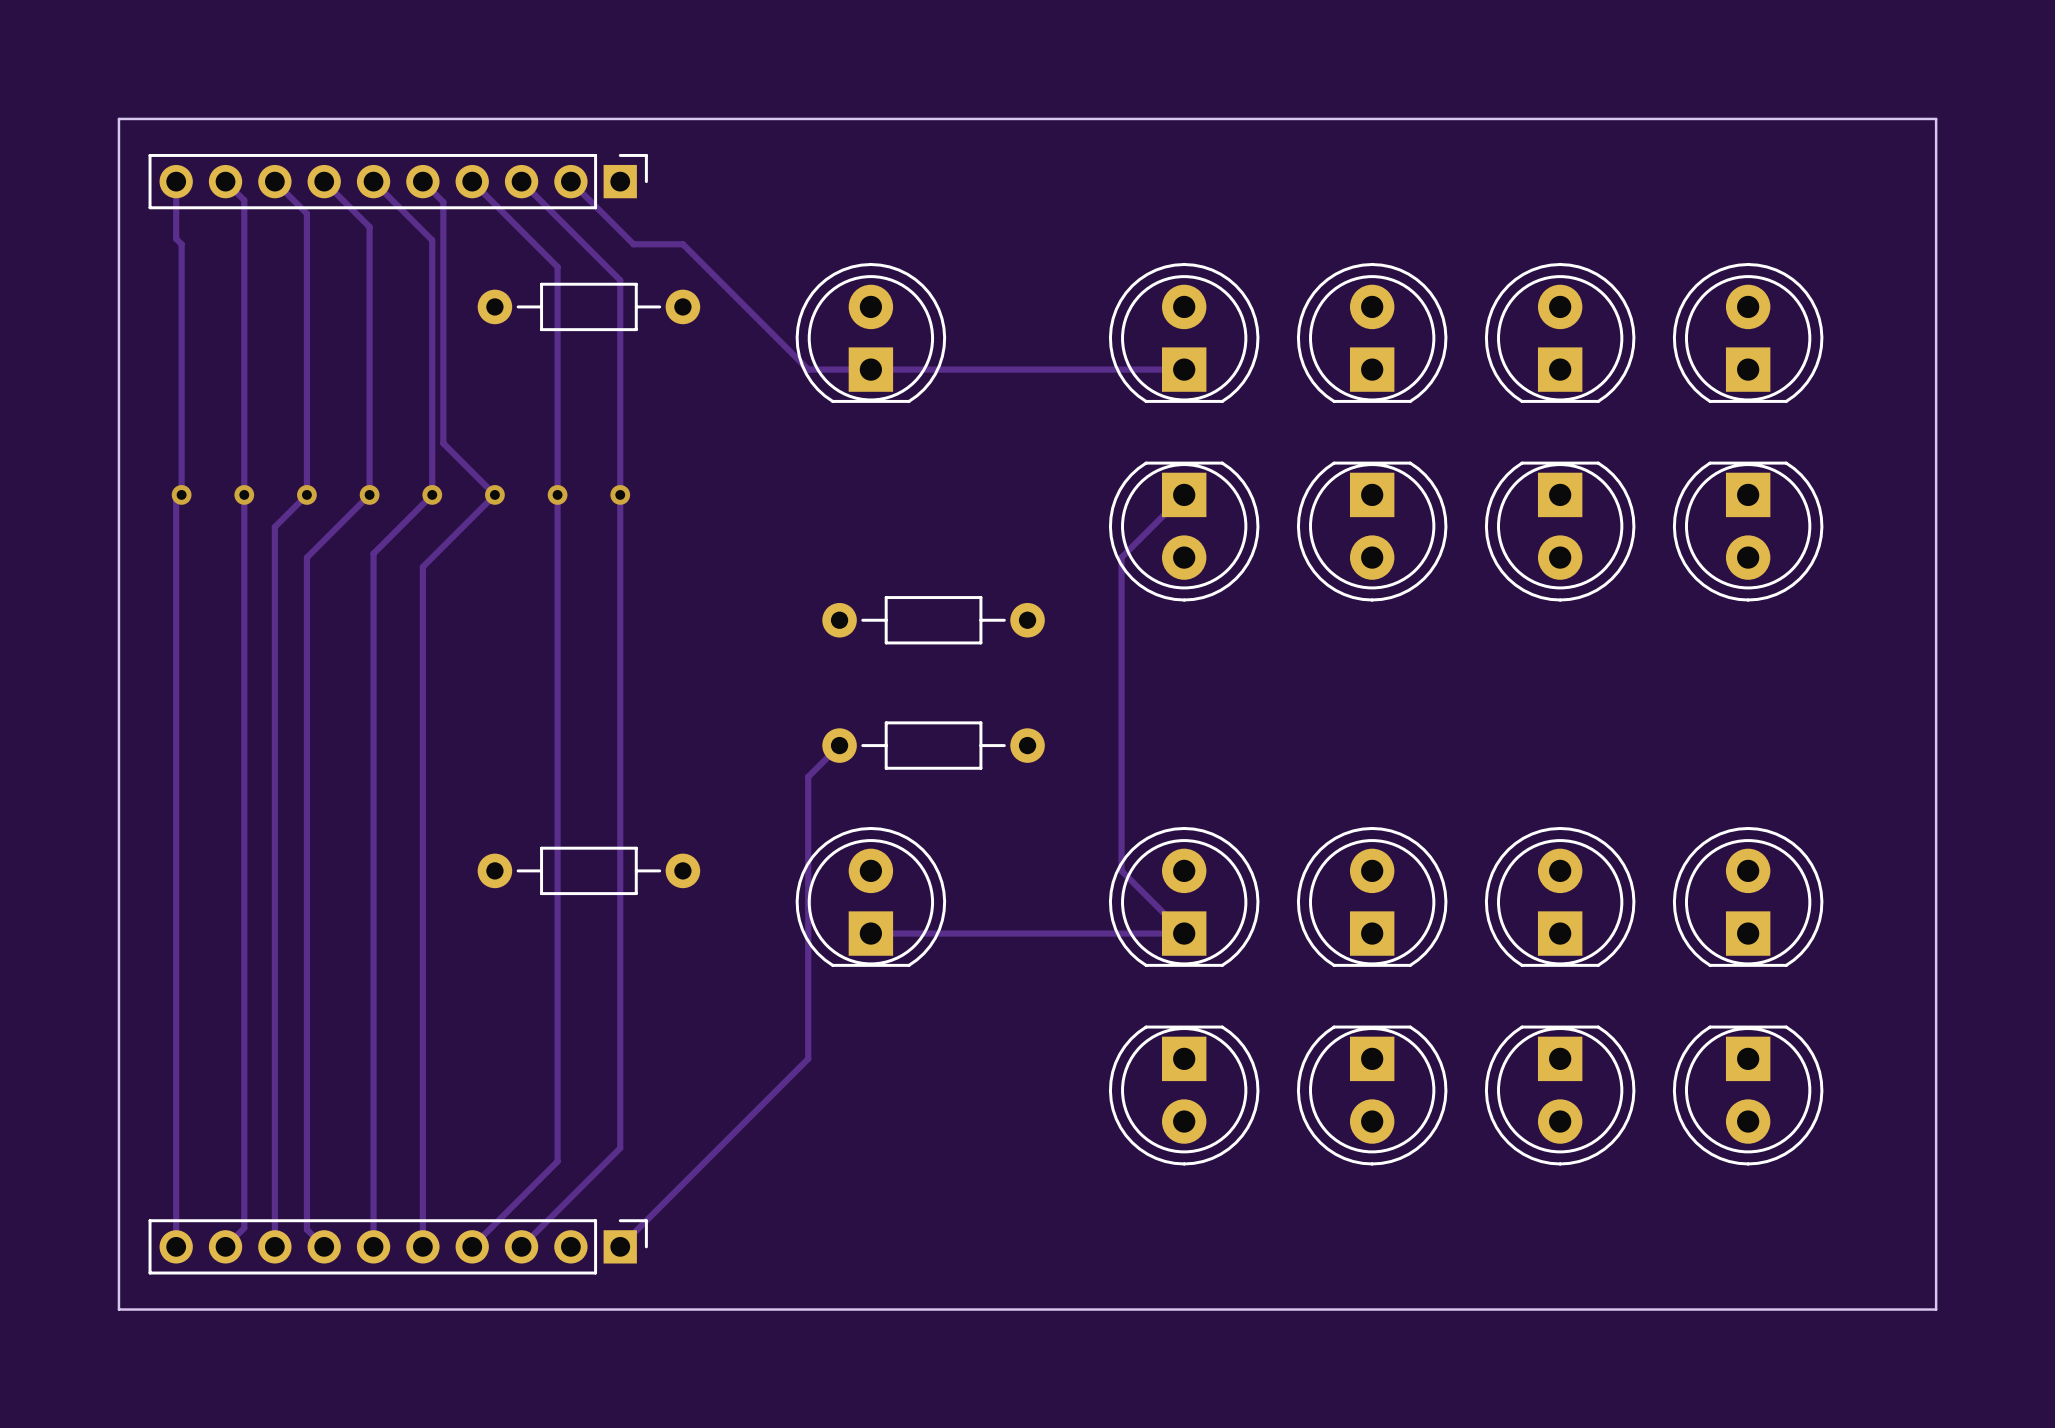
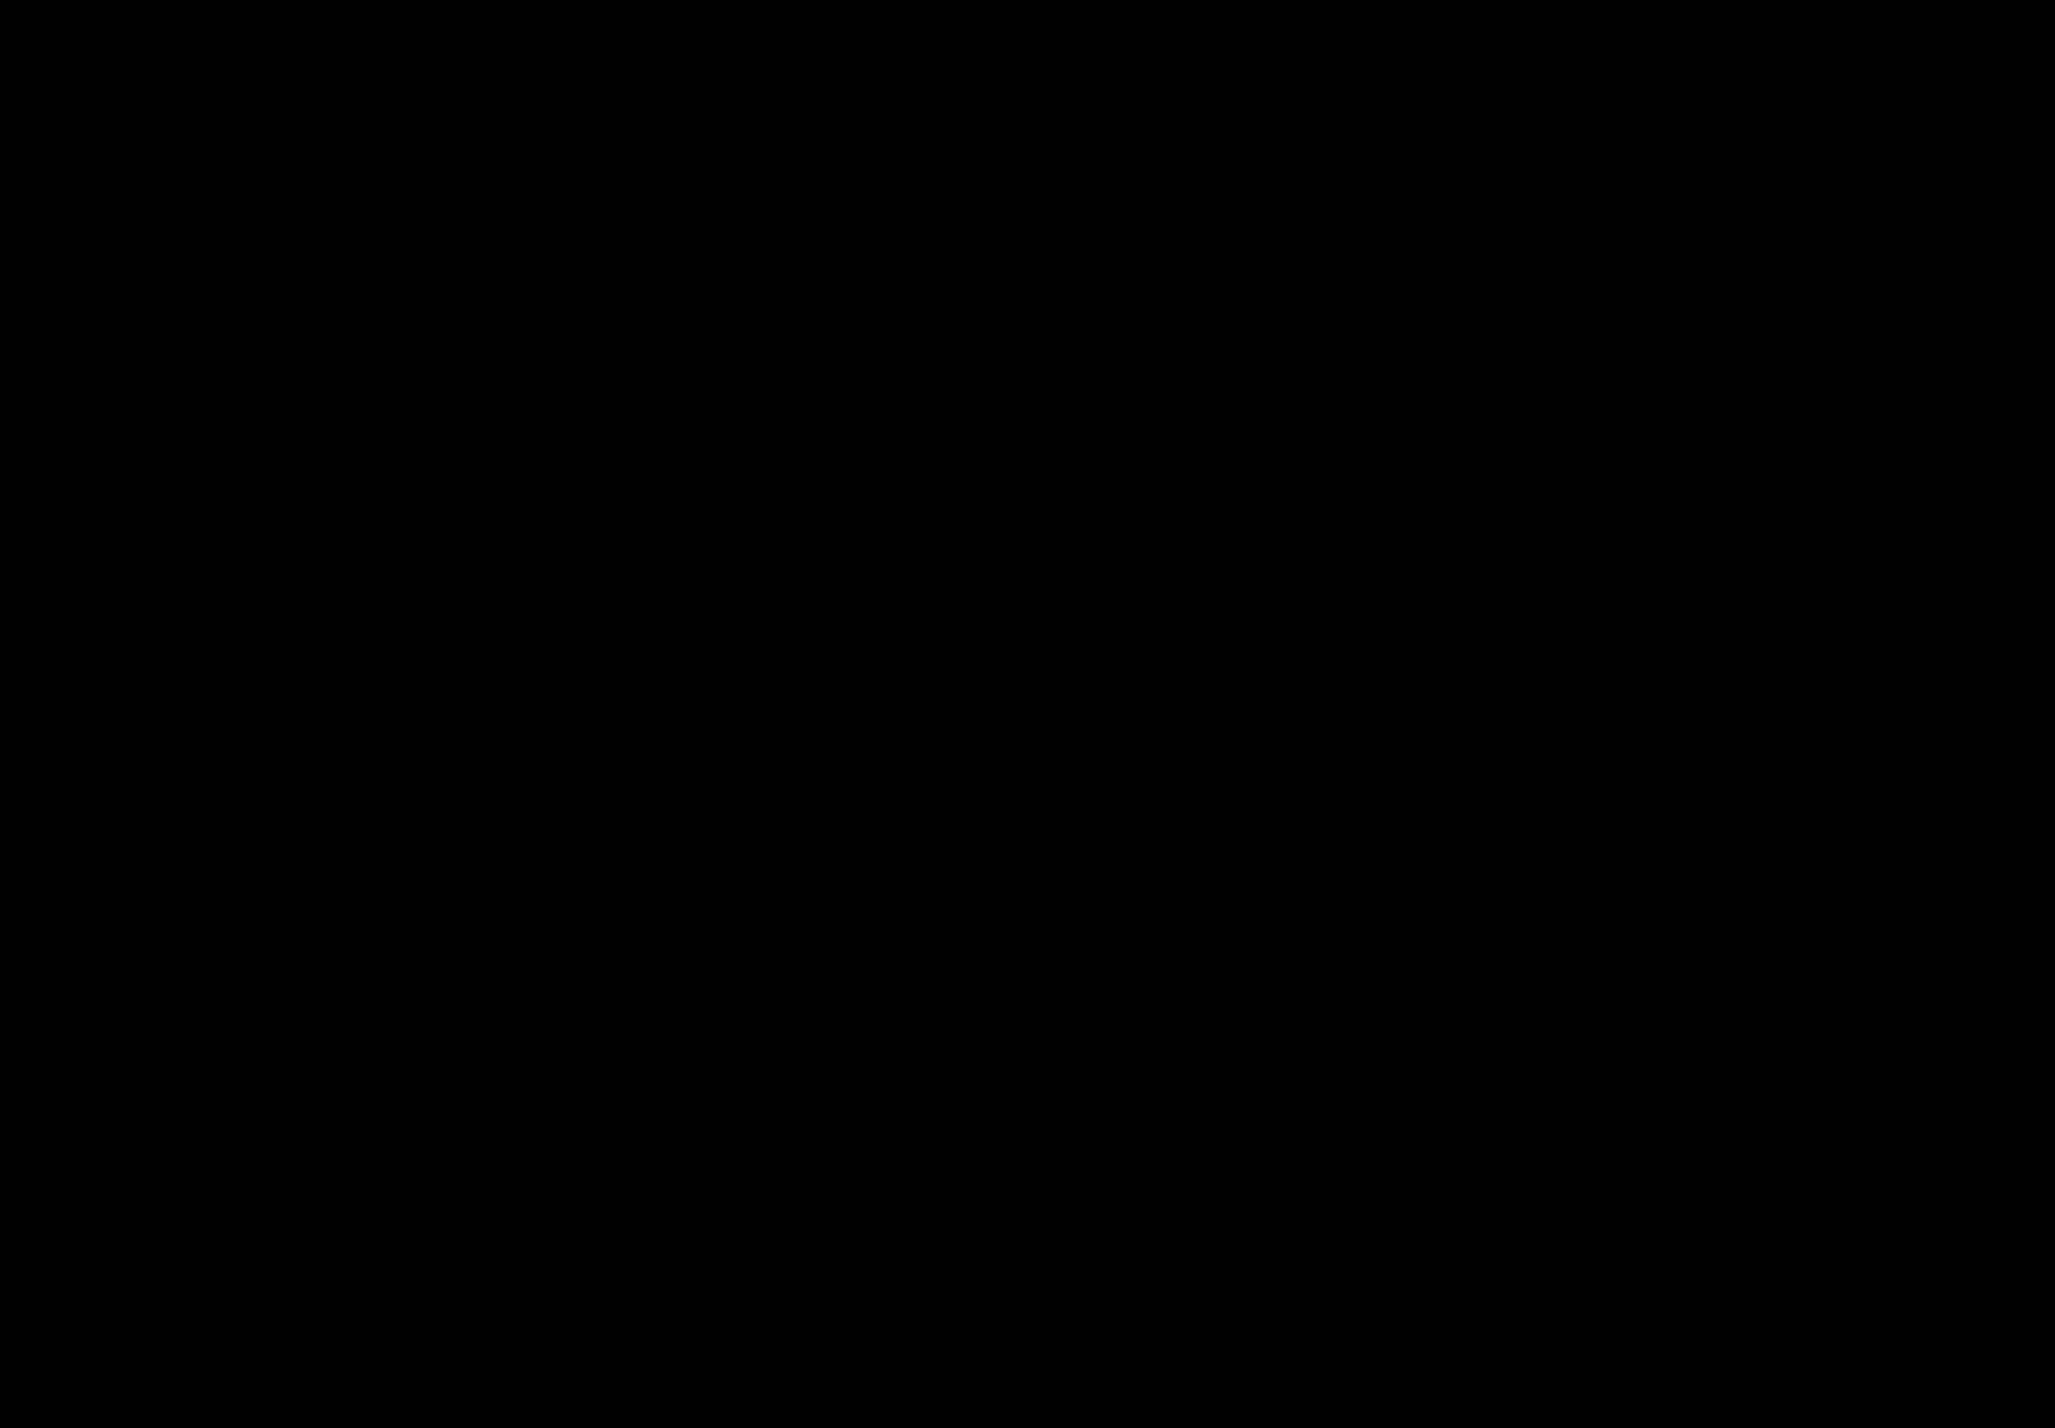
board edge: (118, 118) (1936, 118) (1936, 1309) (118, 1309) (118, 118) -> none
track: (176, 181) (176, 238) (181, 244) (181, 494) (176, 500) (176, 1246) -> none
track: (225, 181) (244, 200) (244, 1228) (225, 1246) -> none
track: (274, 181) (306, 213) (306, 494) (274, 526) (274, 1246) -> none
track: (324, 181) (369, 227) (369, 494) (306, 557) (306, 1229) (324, 1246) -> none
track: (373, 181) (432, 240) (432, 494) (373, 553) (373, 1246) -> none
part: (398, 181) -> none
track: (422, 181) (443, 202) (443, 443) (494, 494) (422, 566) (422, 1246) -> none
track: (472, 181) (557, 266) (557, 1161) (472, 1246) -> none
track: (521, 181) (620, 280) (620, 1148) (521, 1246) -> none
track: (570, 181) (633, 244) (682, 244) (808, 369) (1184, 369) -> none
part: (588, 306) -> none
part: (870, 332) -> none
part: (1184, 332) -> none
part: (1372, 332) -> none
part: (1560, 332) -> none
part: (1748, 332) -> none
via: (181, 494) -> none
via: (244, 494) -> none
via: (306, 494) -> none
via: (369, 494) -> none
via: (432, 494) -> none
via: (494, 494) -> none
via: (557, 494) -> none
via: (620, 494) -> none
track: (1184, 494) (1121, 557) (1121, 870) (1184, 933) (870, 933) -> none
part: (1184, 531) -> none
part: (1372, 531) -> none
part: (1560, 531) -> none
part: (1748, 531) -> none
part: (933, 620) -> none
track: (839, 745) (808, 776) (808, 1058) (620, 1246) -> none
part: (933, 745) -> none
part: (588, 870) -> none
part: (870, 896) -> none
part: (1184, 896) -> none
part: (1372, 896) -> none
part: (1560, 896) -> none
part: (1748, 896) -> none
part: (1184, 1095) -> none
part: (1372, 1095) -> none
part: (1560, 1095) -> none
part: (1748, 1095) -> none
part: (398, 1246) -> none

